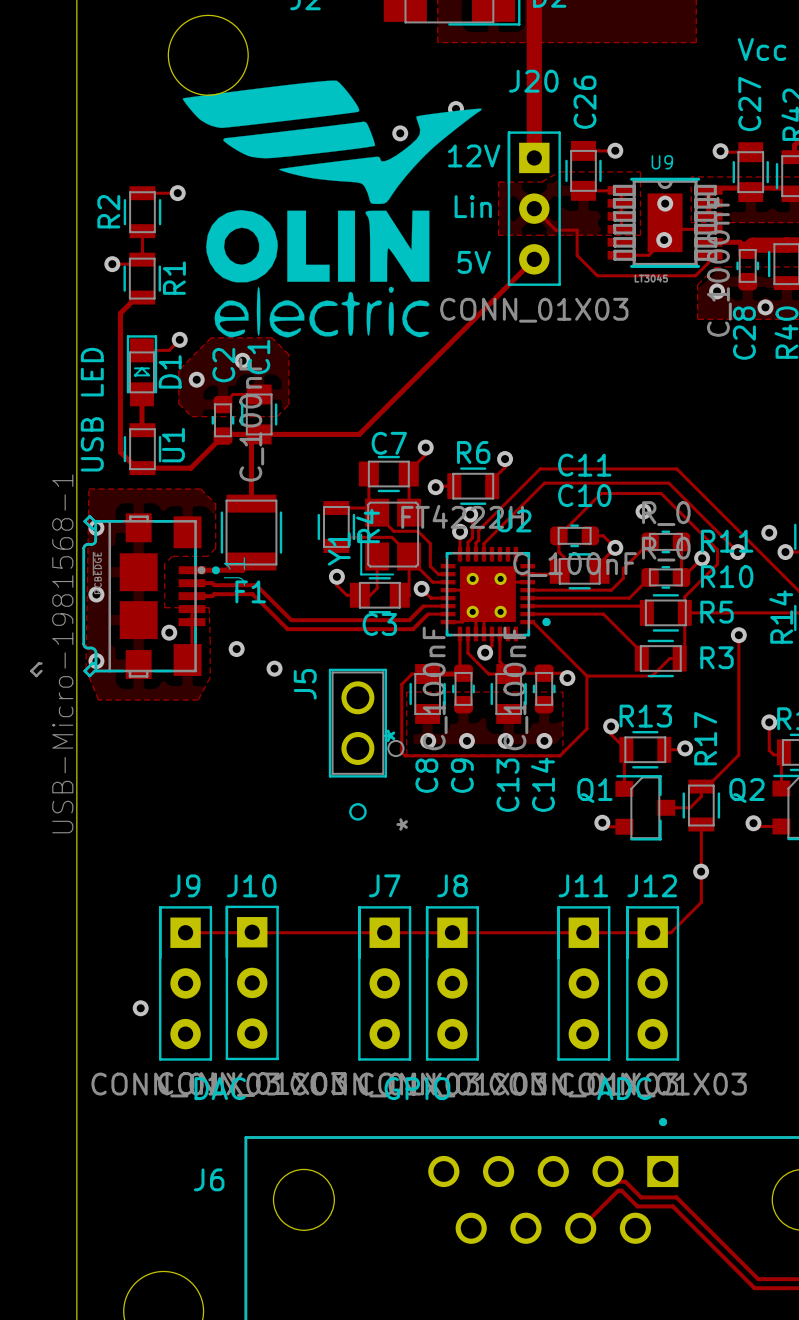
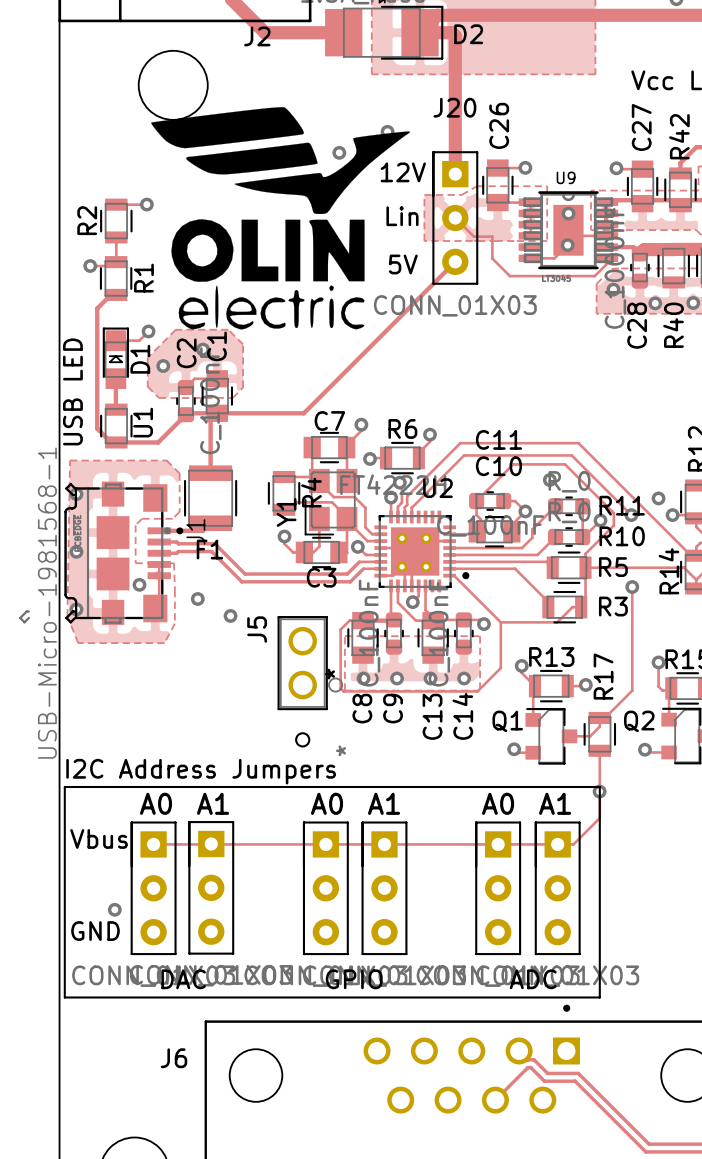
text: none -> I2C Address Jumpers (201, 771)
line: none -> (64, 786) (599, 786) (599, 997) (64, 997) (64, 786)
J9 name: J9 (185, 885) -> none
text: none -> A0 (155, 803)
J10 name: J10 (251, 885) -> none
text: none -> A1 (213, 803)
J7 name: J7 (384, 885) -> none
text: none -> A0 (327, 803)
text: none -> A1 (384, 803)
J8 name: J8 (452, 885) -> none
J11 name: J11 (583, 885) -> none
text: none -> A0 (498, 803)
text: none -> A1 (555, 803)
J12 name: J12 (652, 885) -> none
text: none -> Vbus (99, 838)
text: none -> GND (95, 931)

